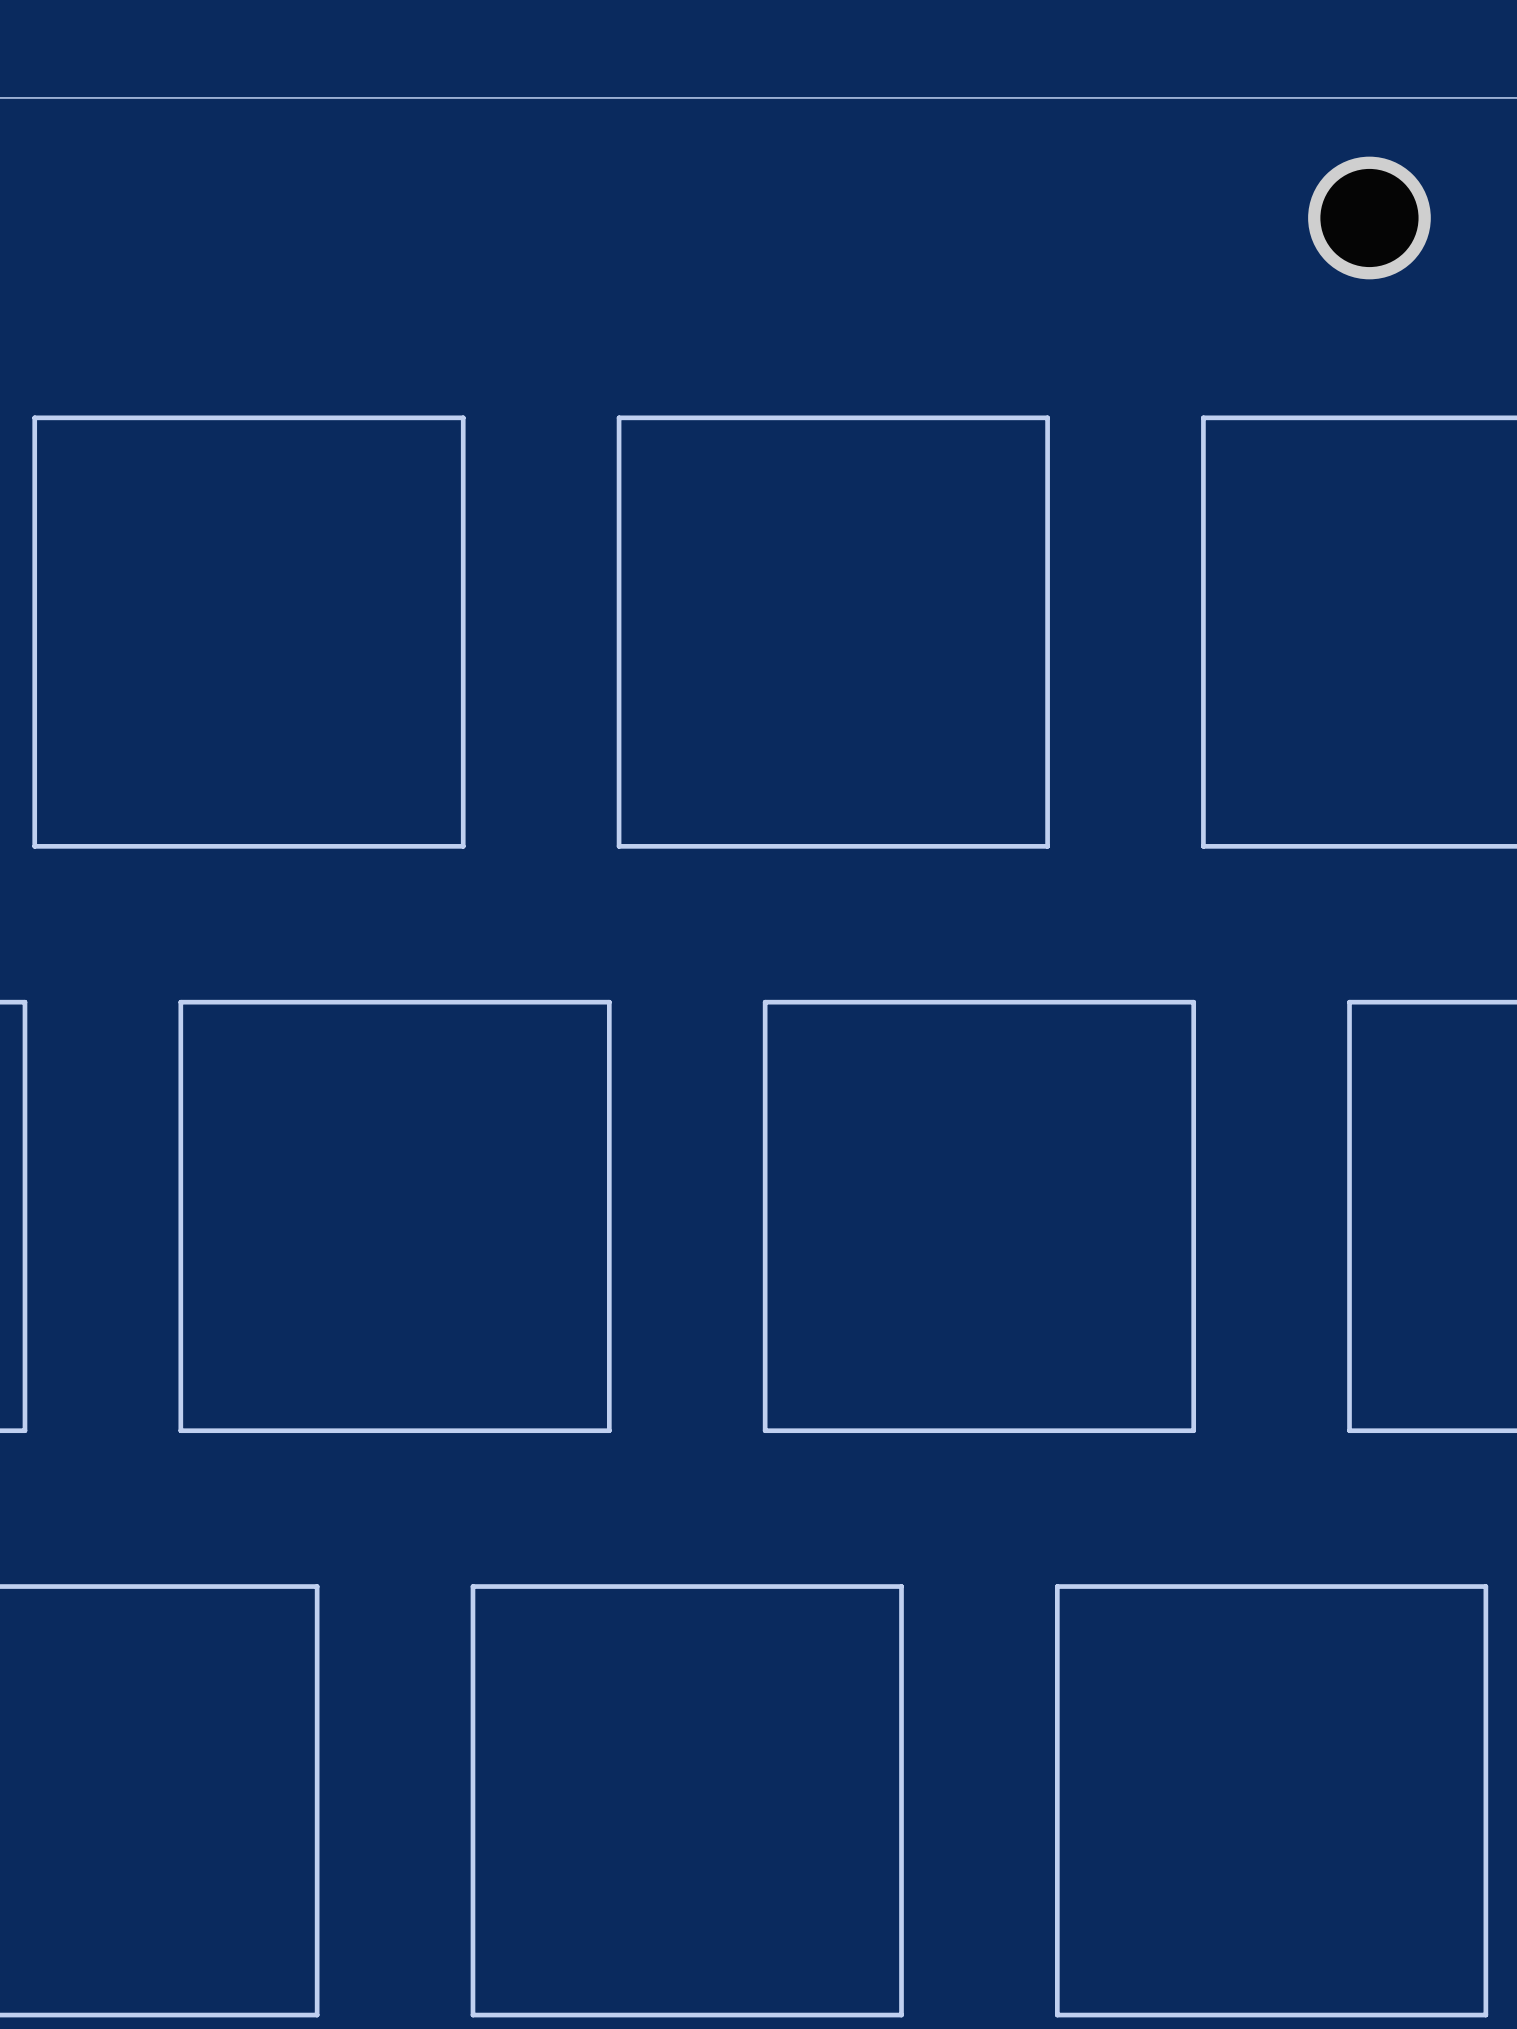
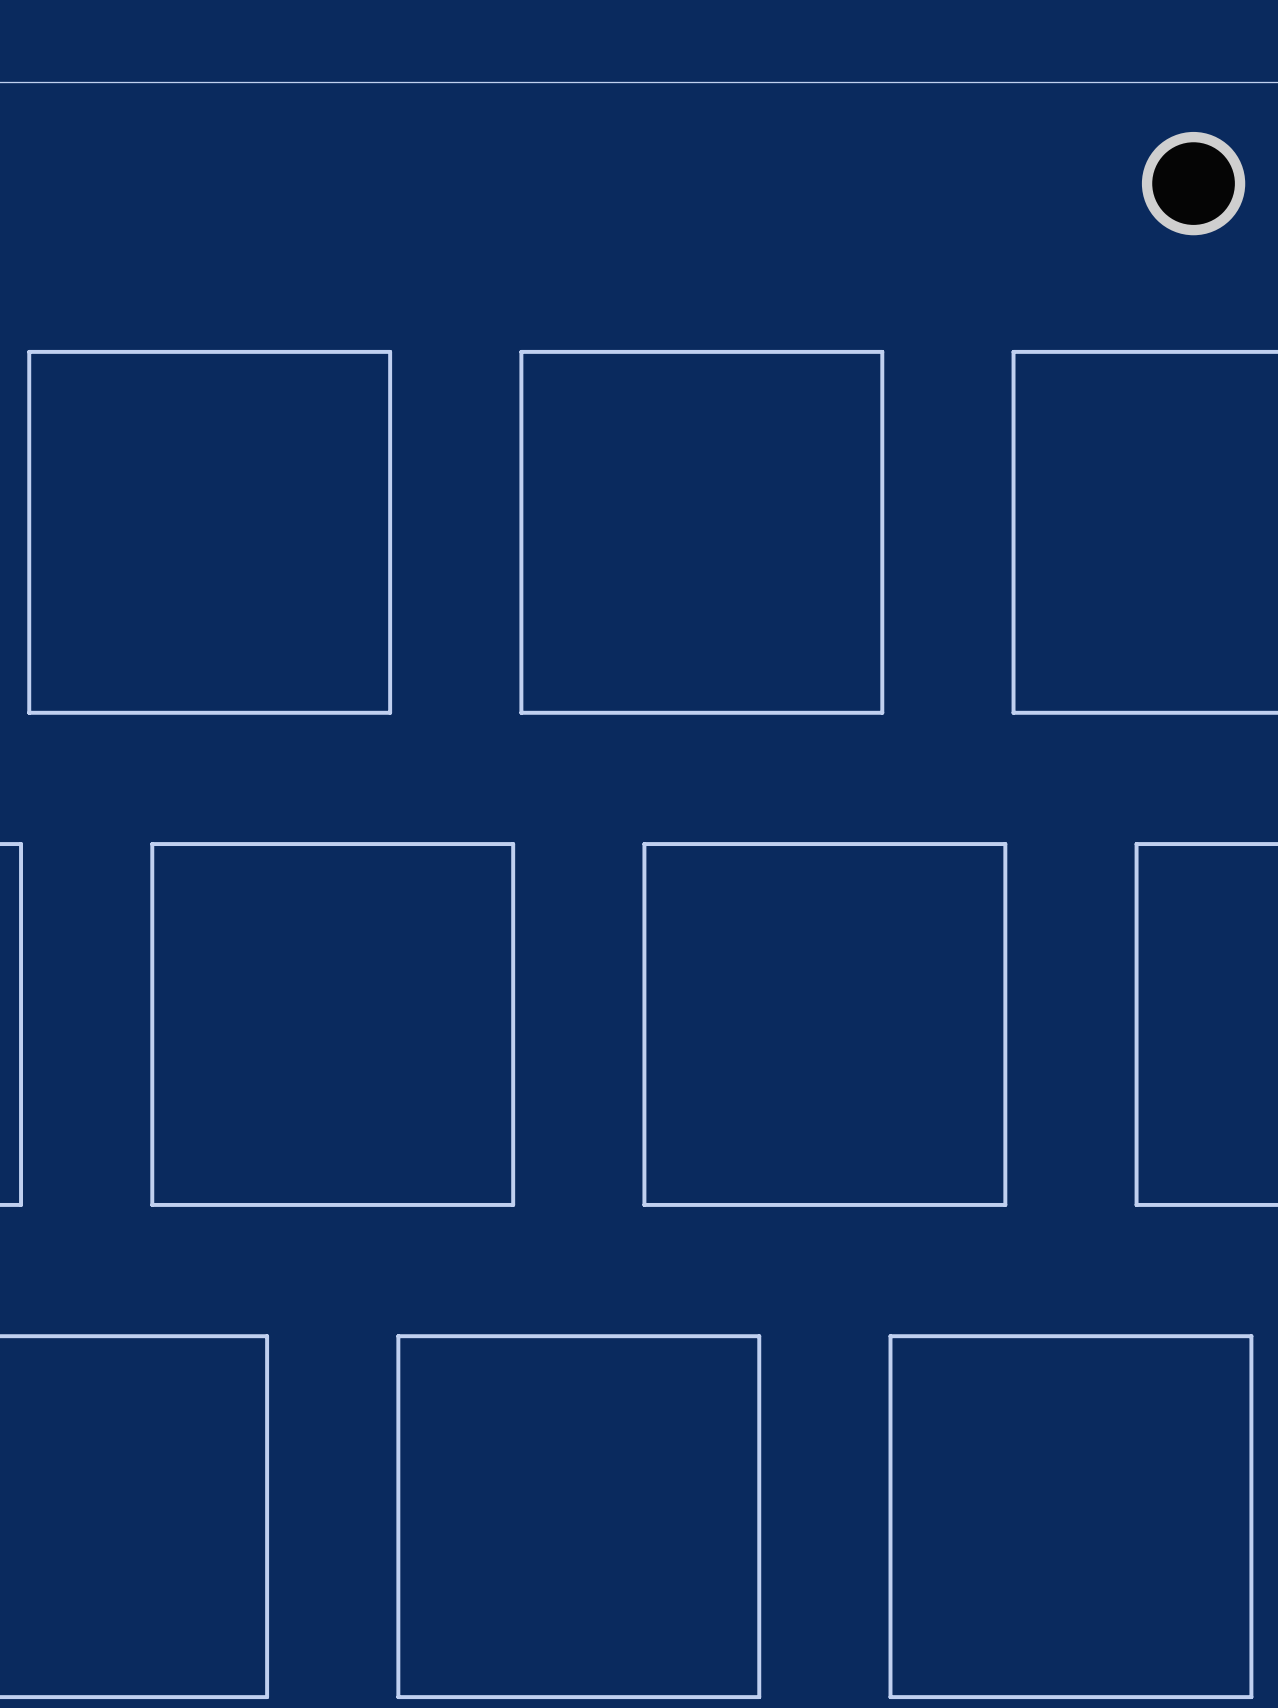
part position: (1369, 217) -> (1193, 183)

